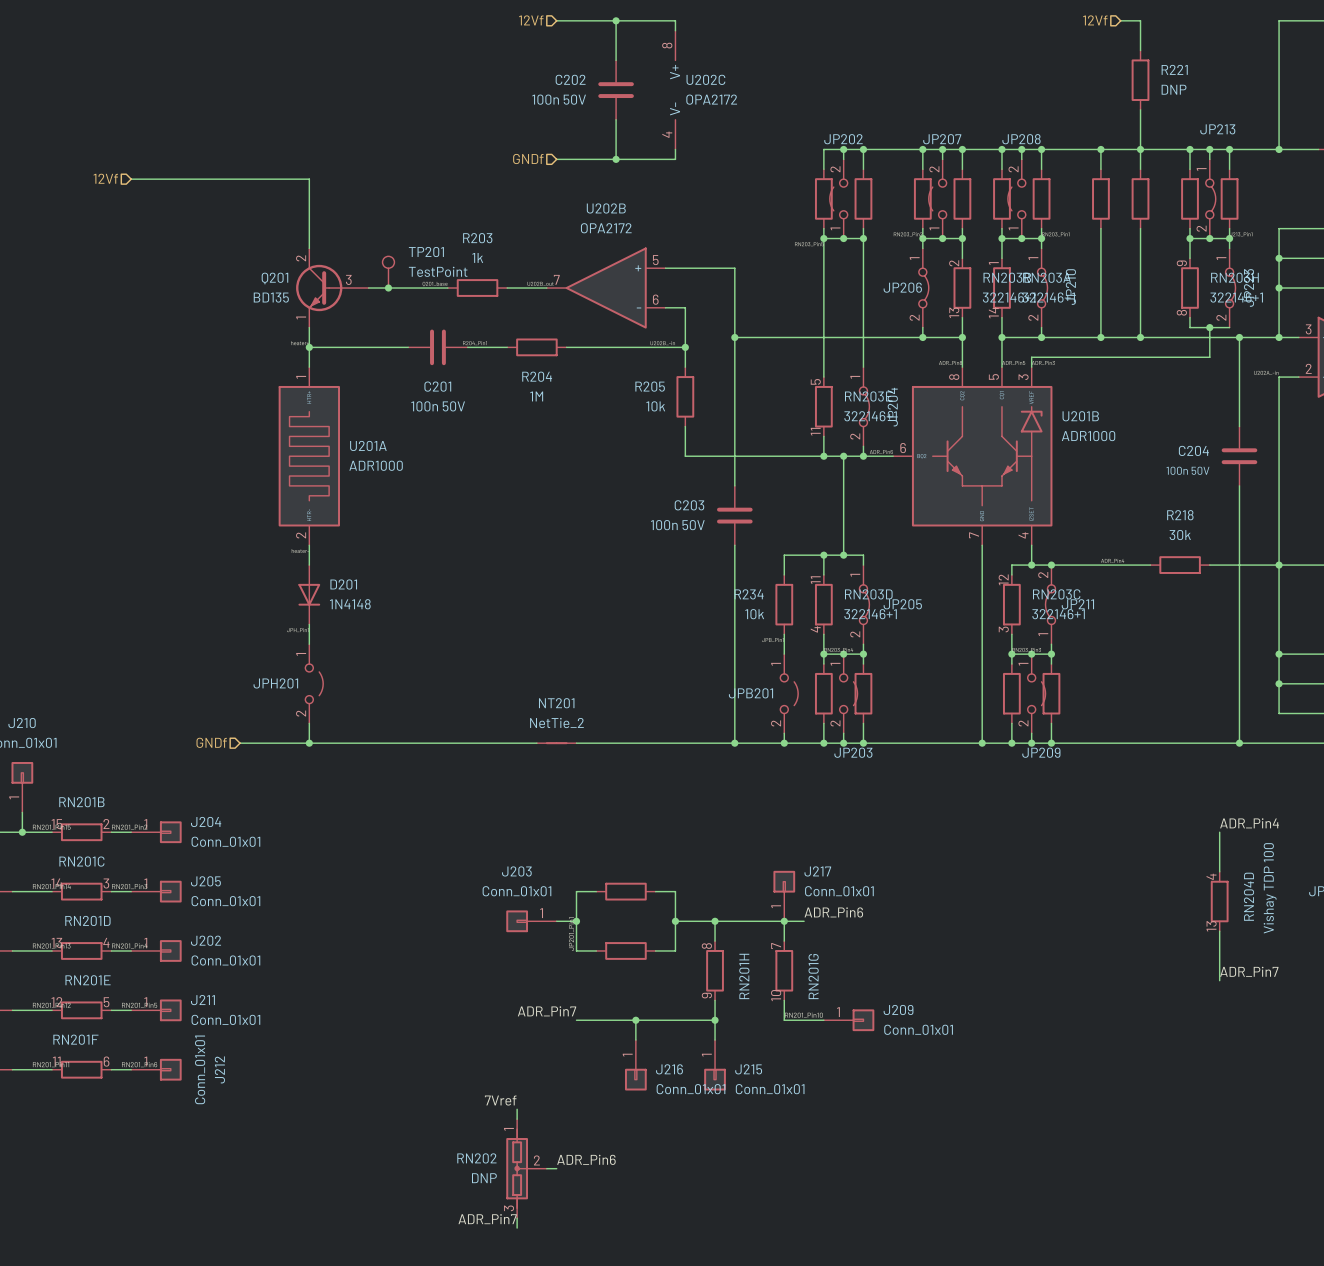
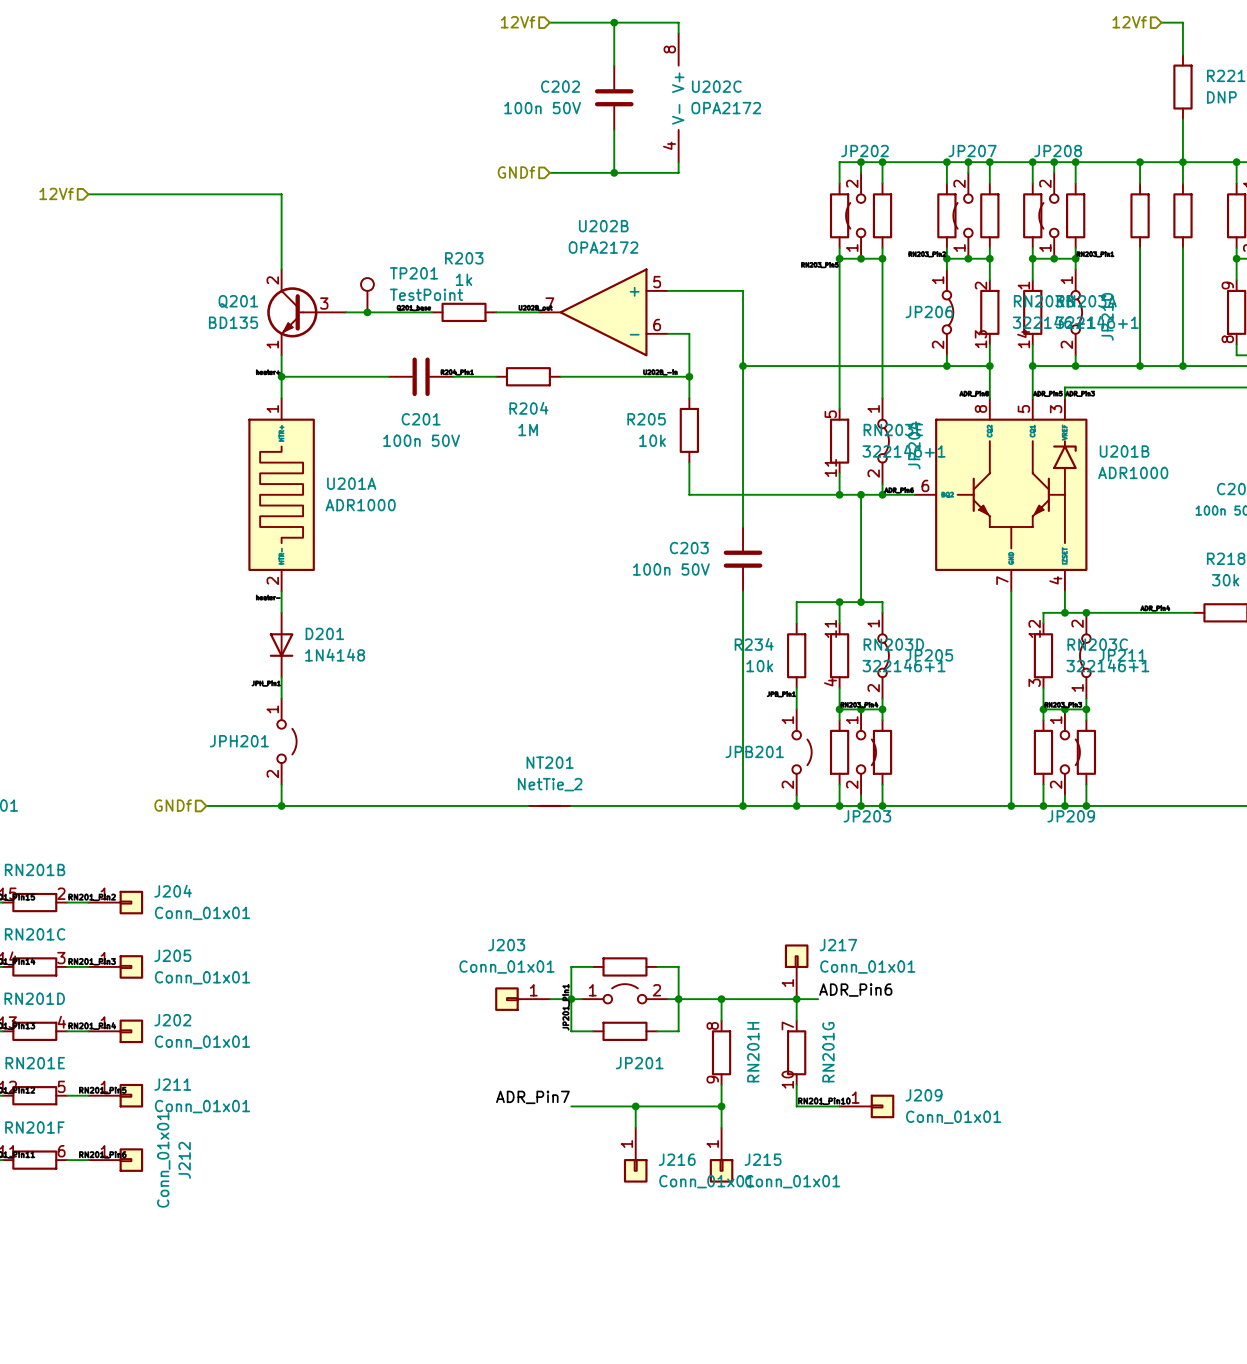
JP201: none -> (624, 993)
wire: none -> (571, 999) (582, 999)
wire: none -> (667, 999) (678, 999)
label: 7Vref (500, 1100) -> none
wire: (517, 1109) (517, 1119) -> none
label: ADR_Pin6 (586, 1159) -> none
RN202: DNP (526, 1168) -> none
wire: (546, 1168) (556, 1168) -> none
wire: (517, 1218) (517, 1228) -> none
label: ADR_Pin7 (487, 1219) -> none

